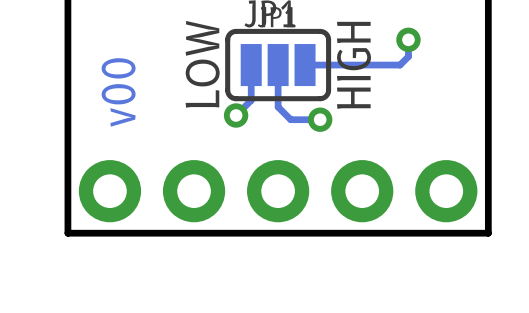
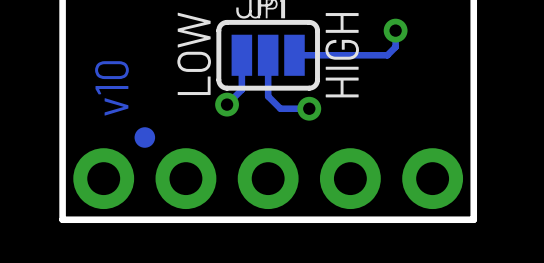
text: v00 (118, 92) -> v10 (111, 88)
part: none -> (144, 137)

